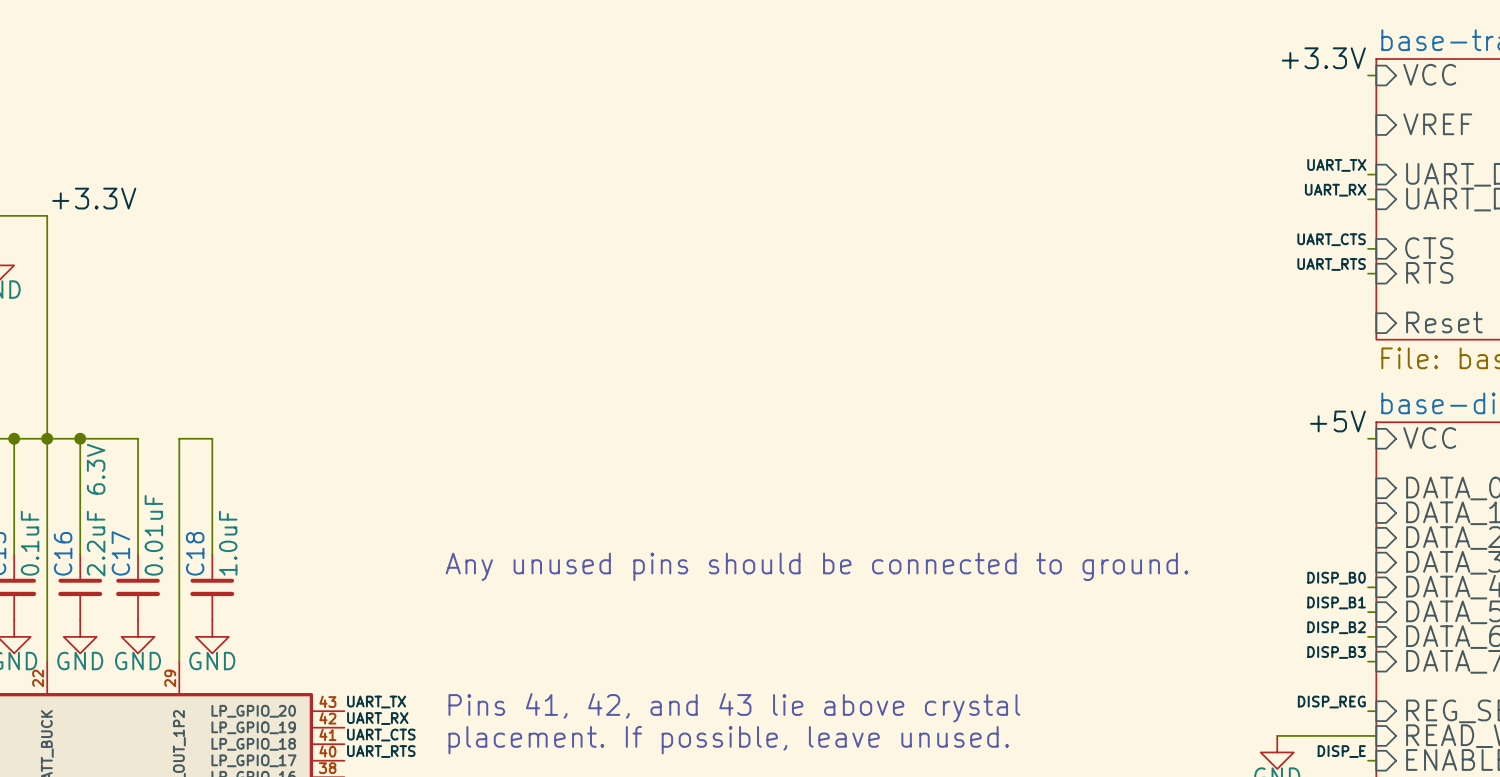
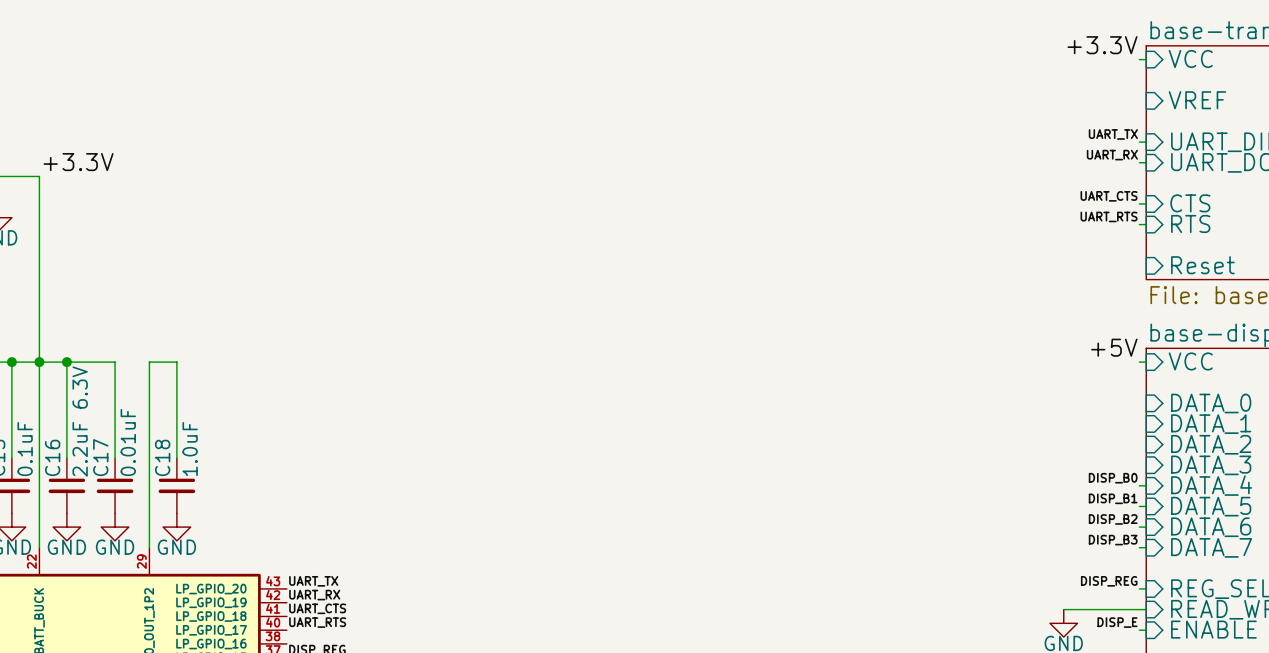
text: Any unused pins should be connected to ground. (816, 566) -> none
text: Pins 41, 42, and 43 lie above crystal (734, 707) -> none
text: placement. If possible, leave unused. (728, 740) -> none

